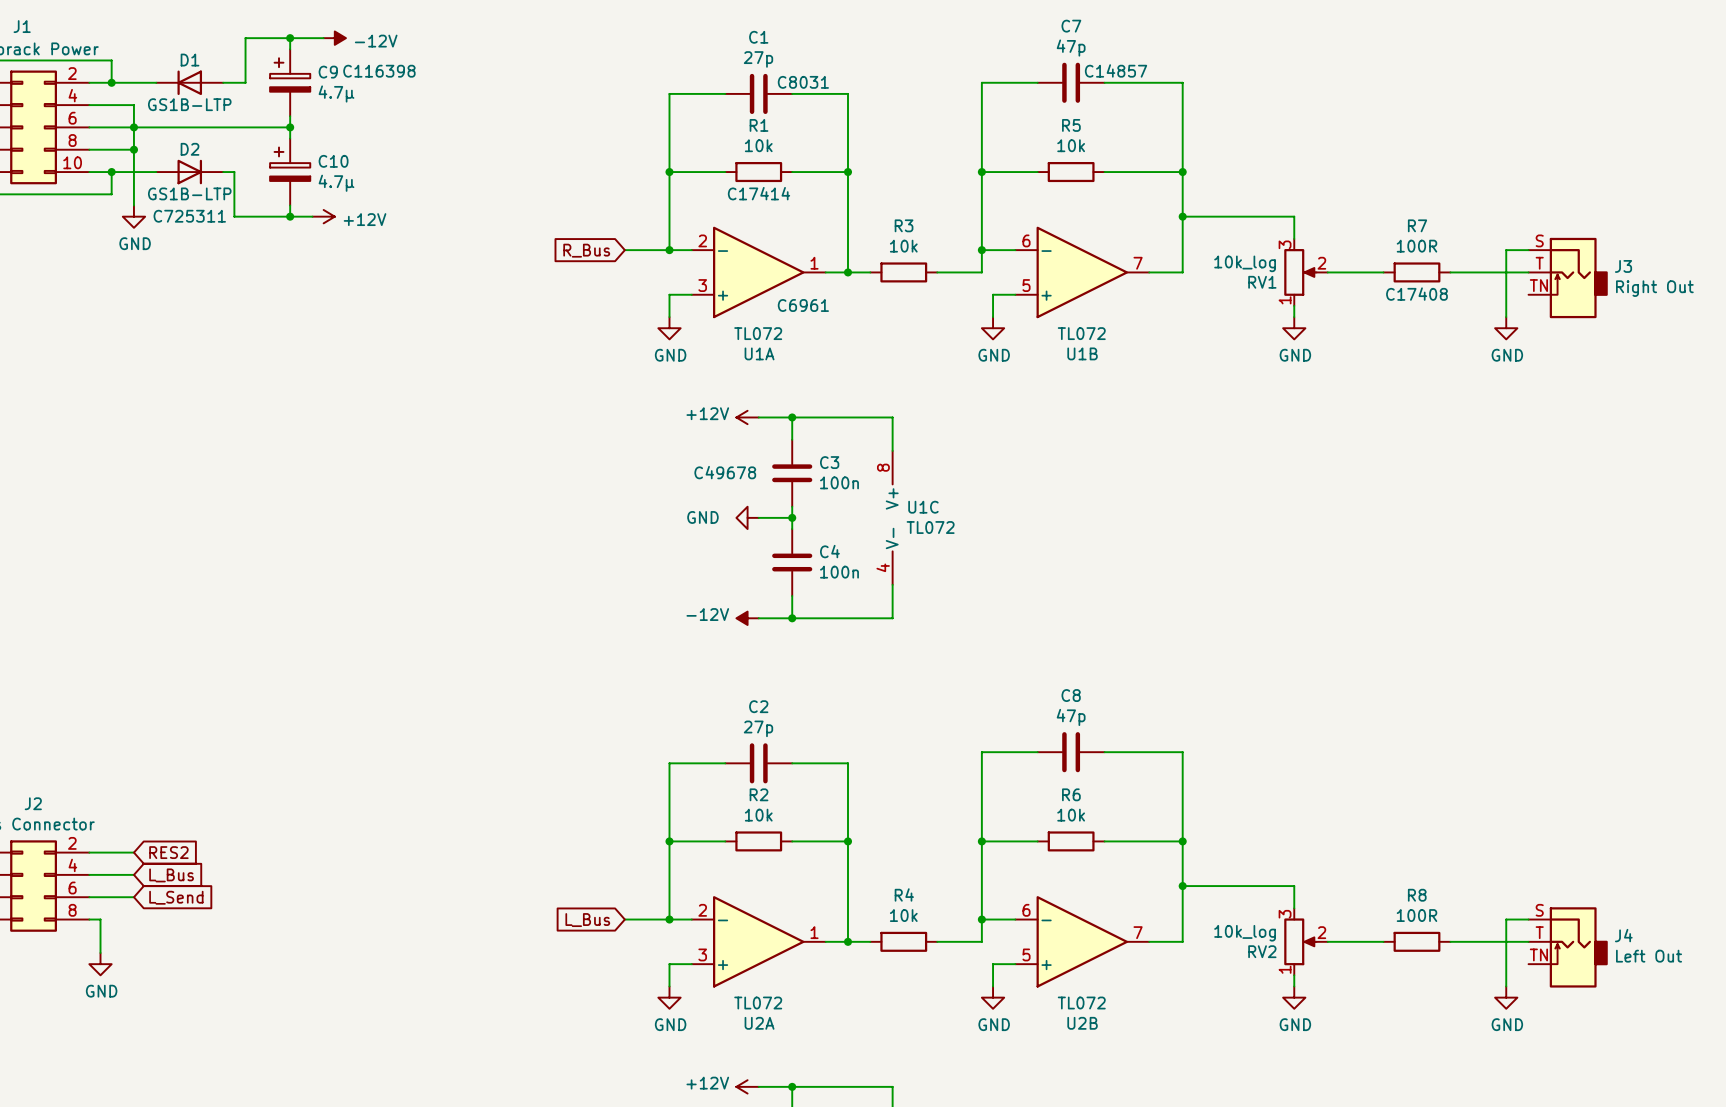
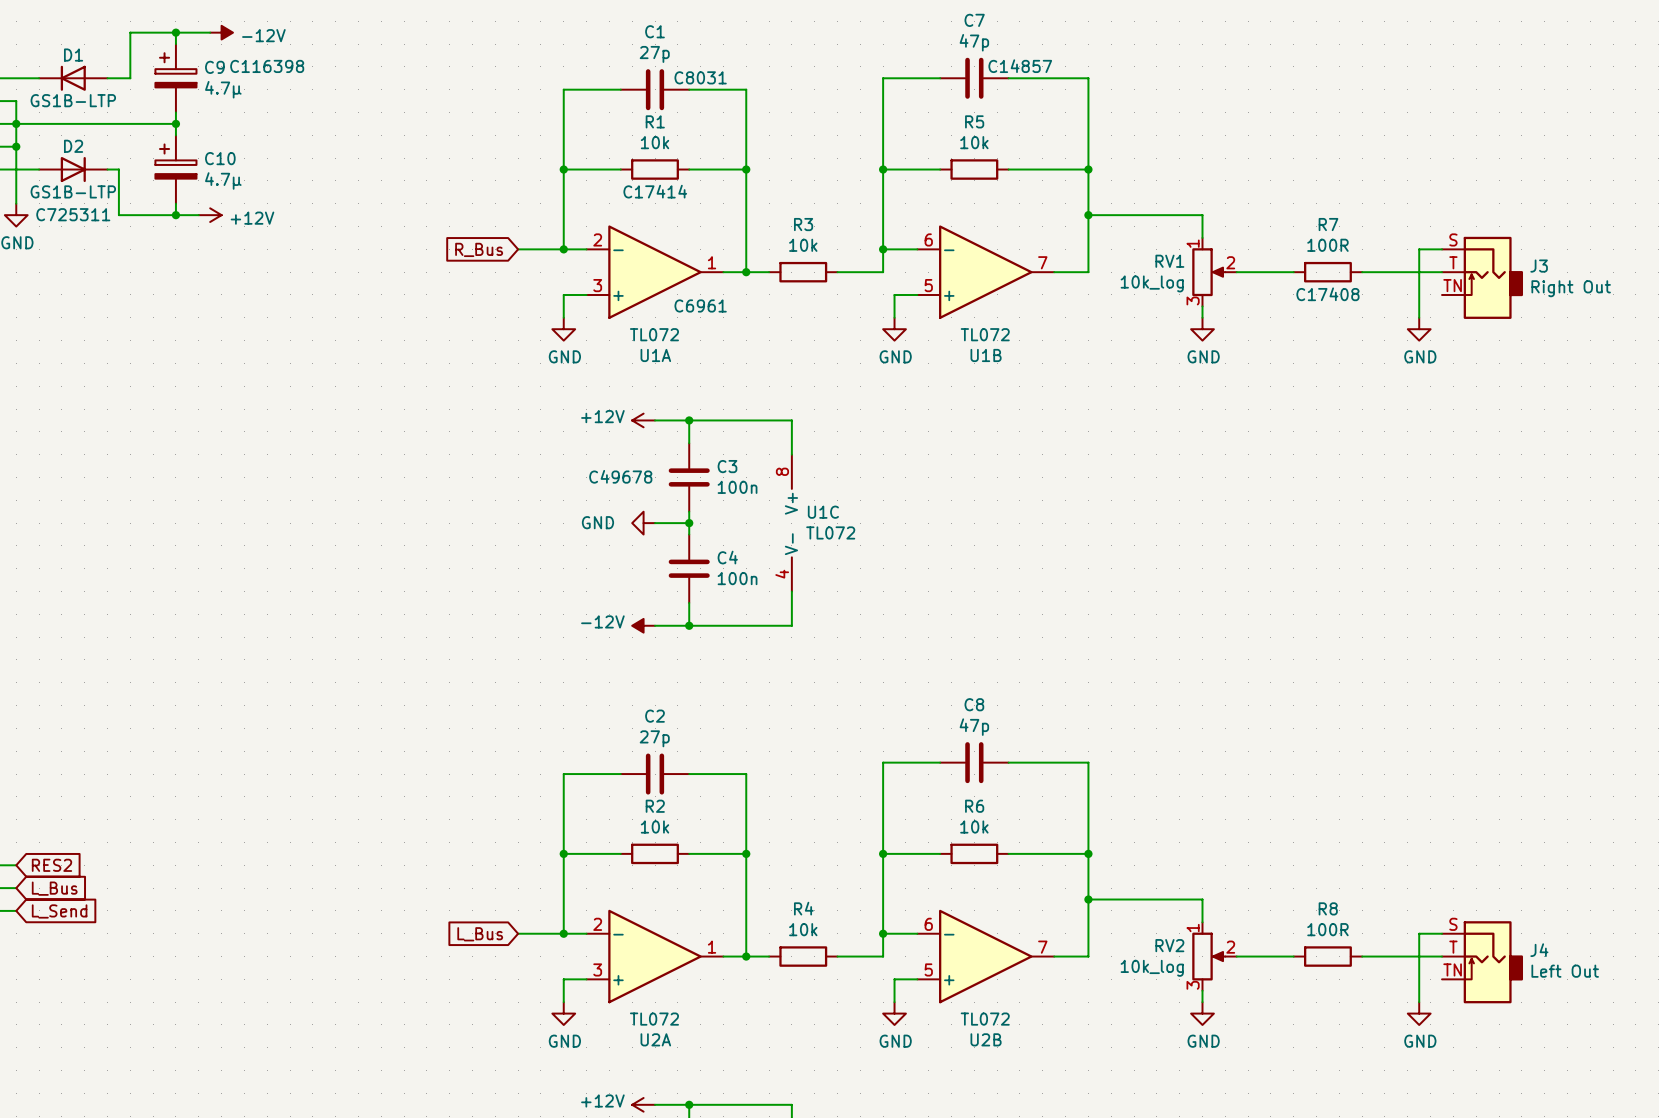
RV1 flip: as is (1300, 272) -> up-down (1208, 272)
RV2 flip: as is (1300, 941) -> up-down (1208, 956)

